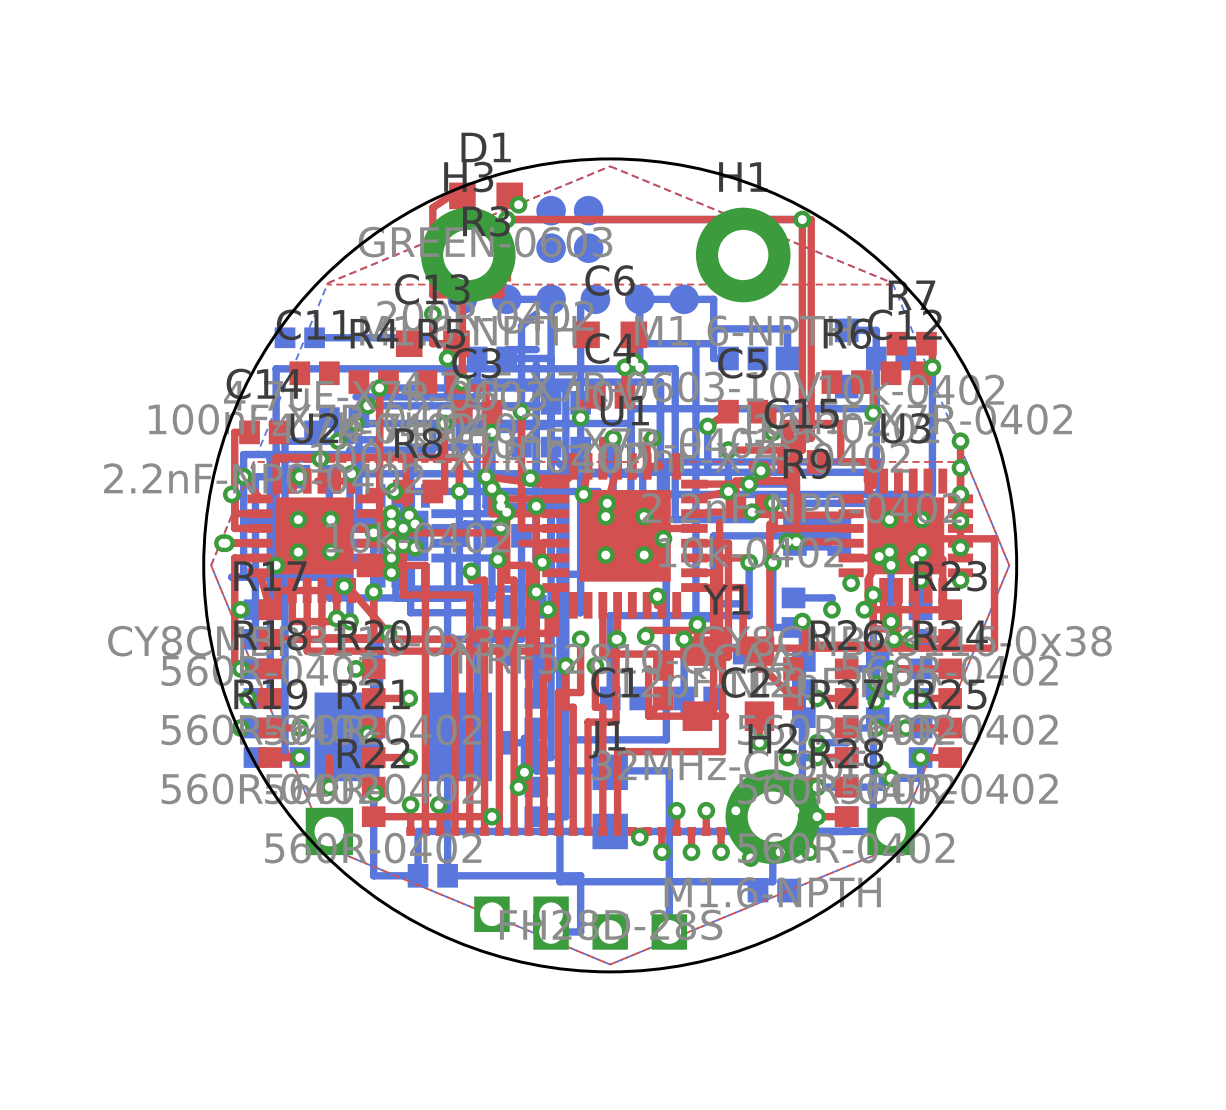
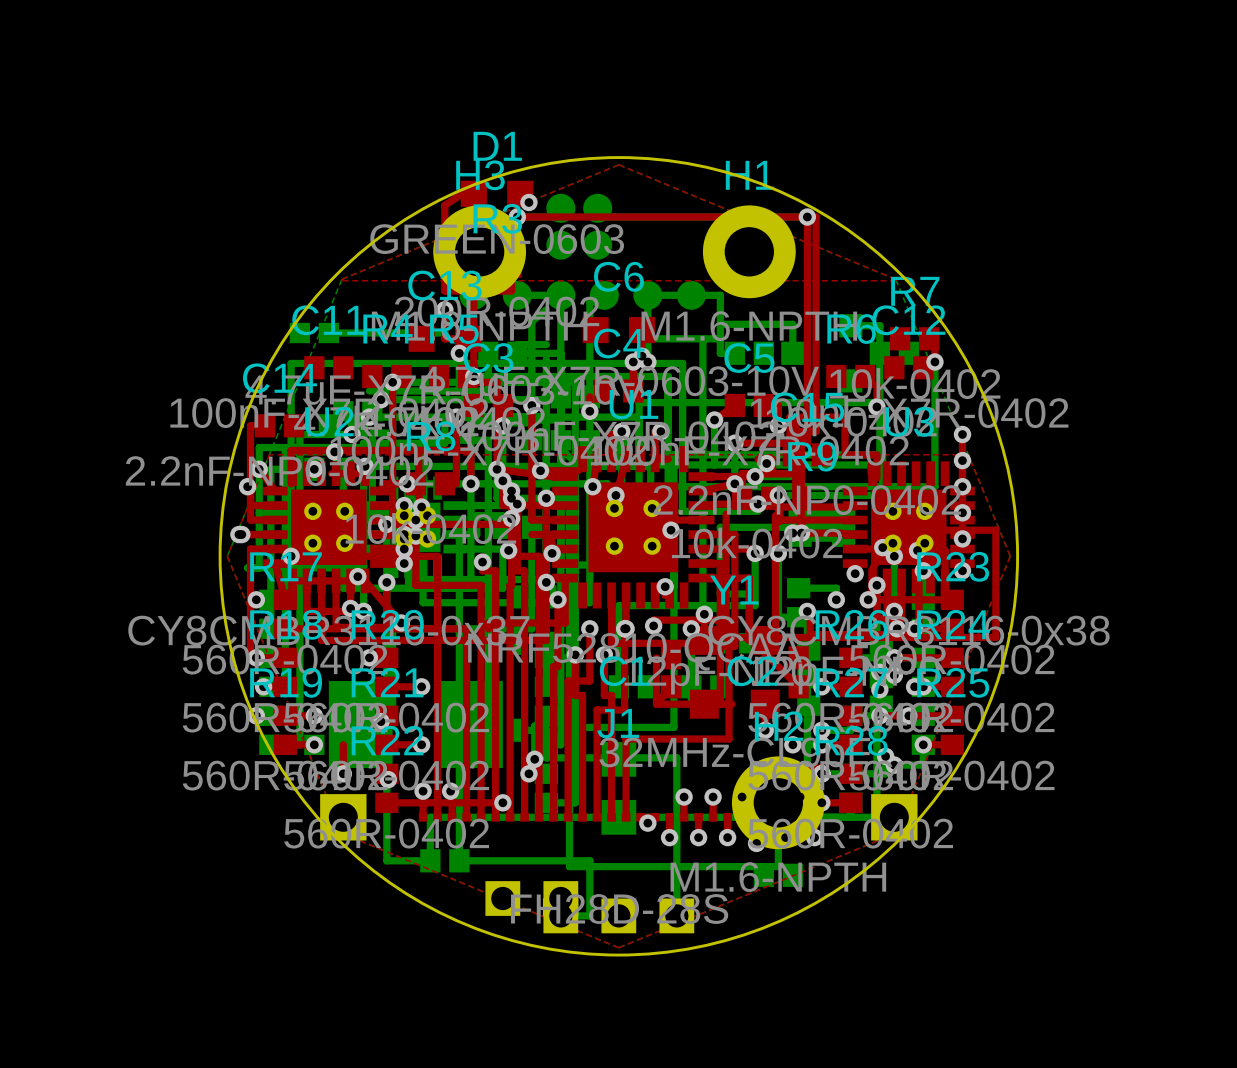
top track: (505, 498) (542, 498) -> none

